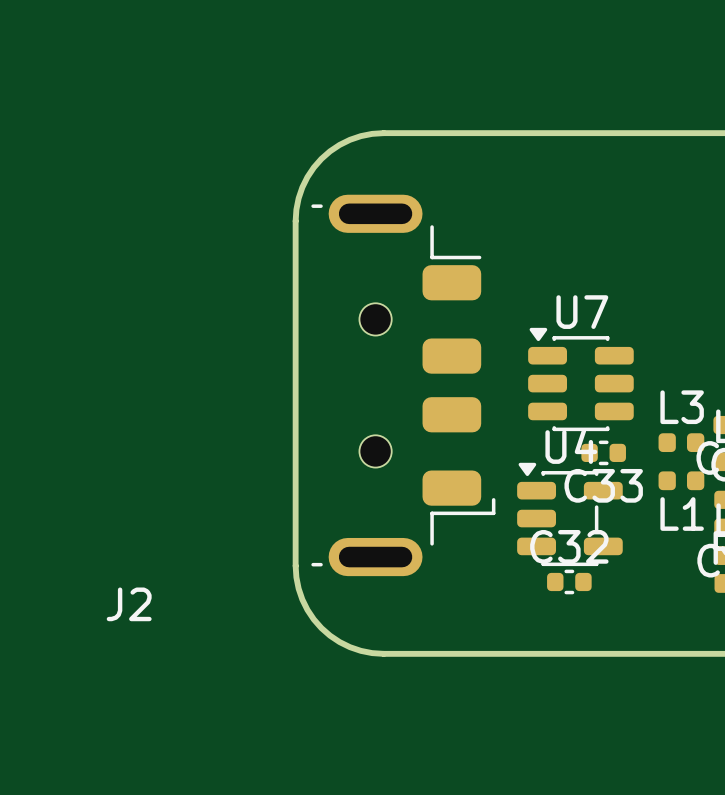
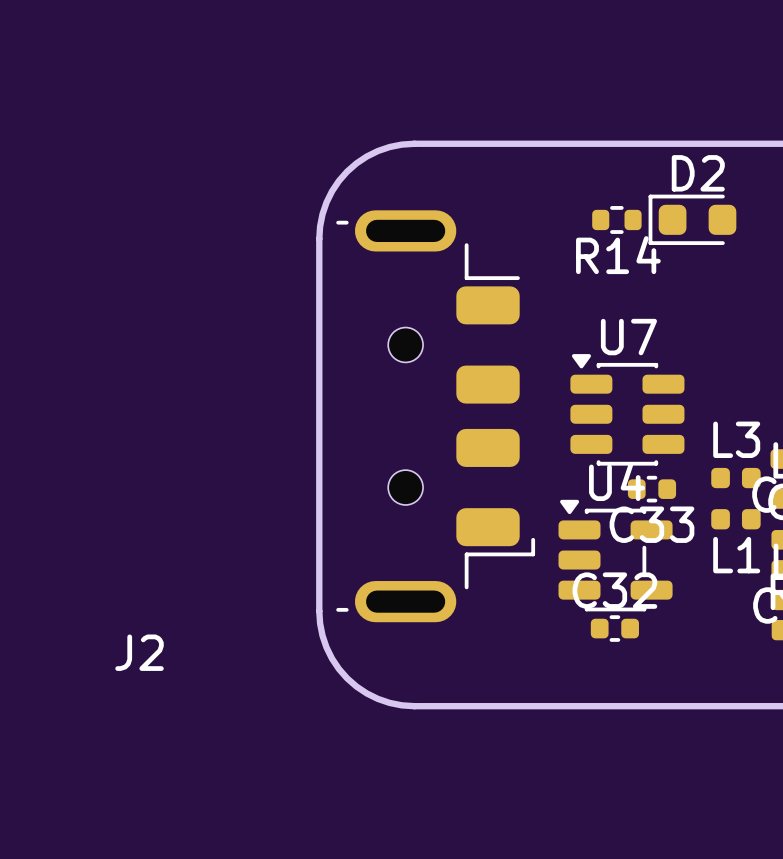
R14: none -> (616, 219)
D2: none -> (692, 219)

